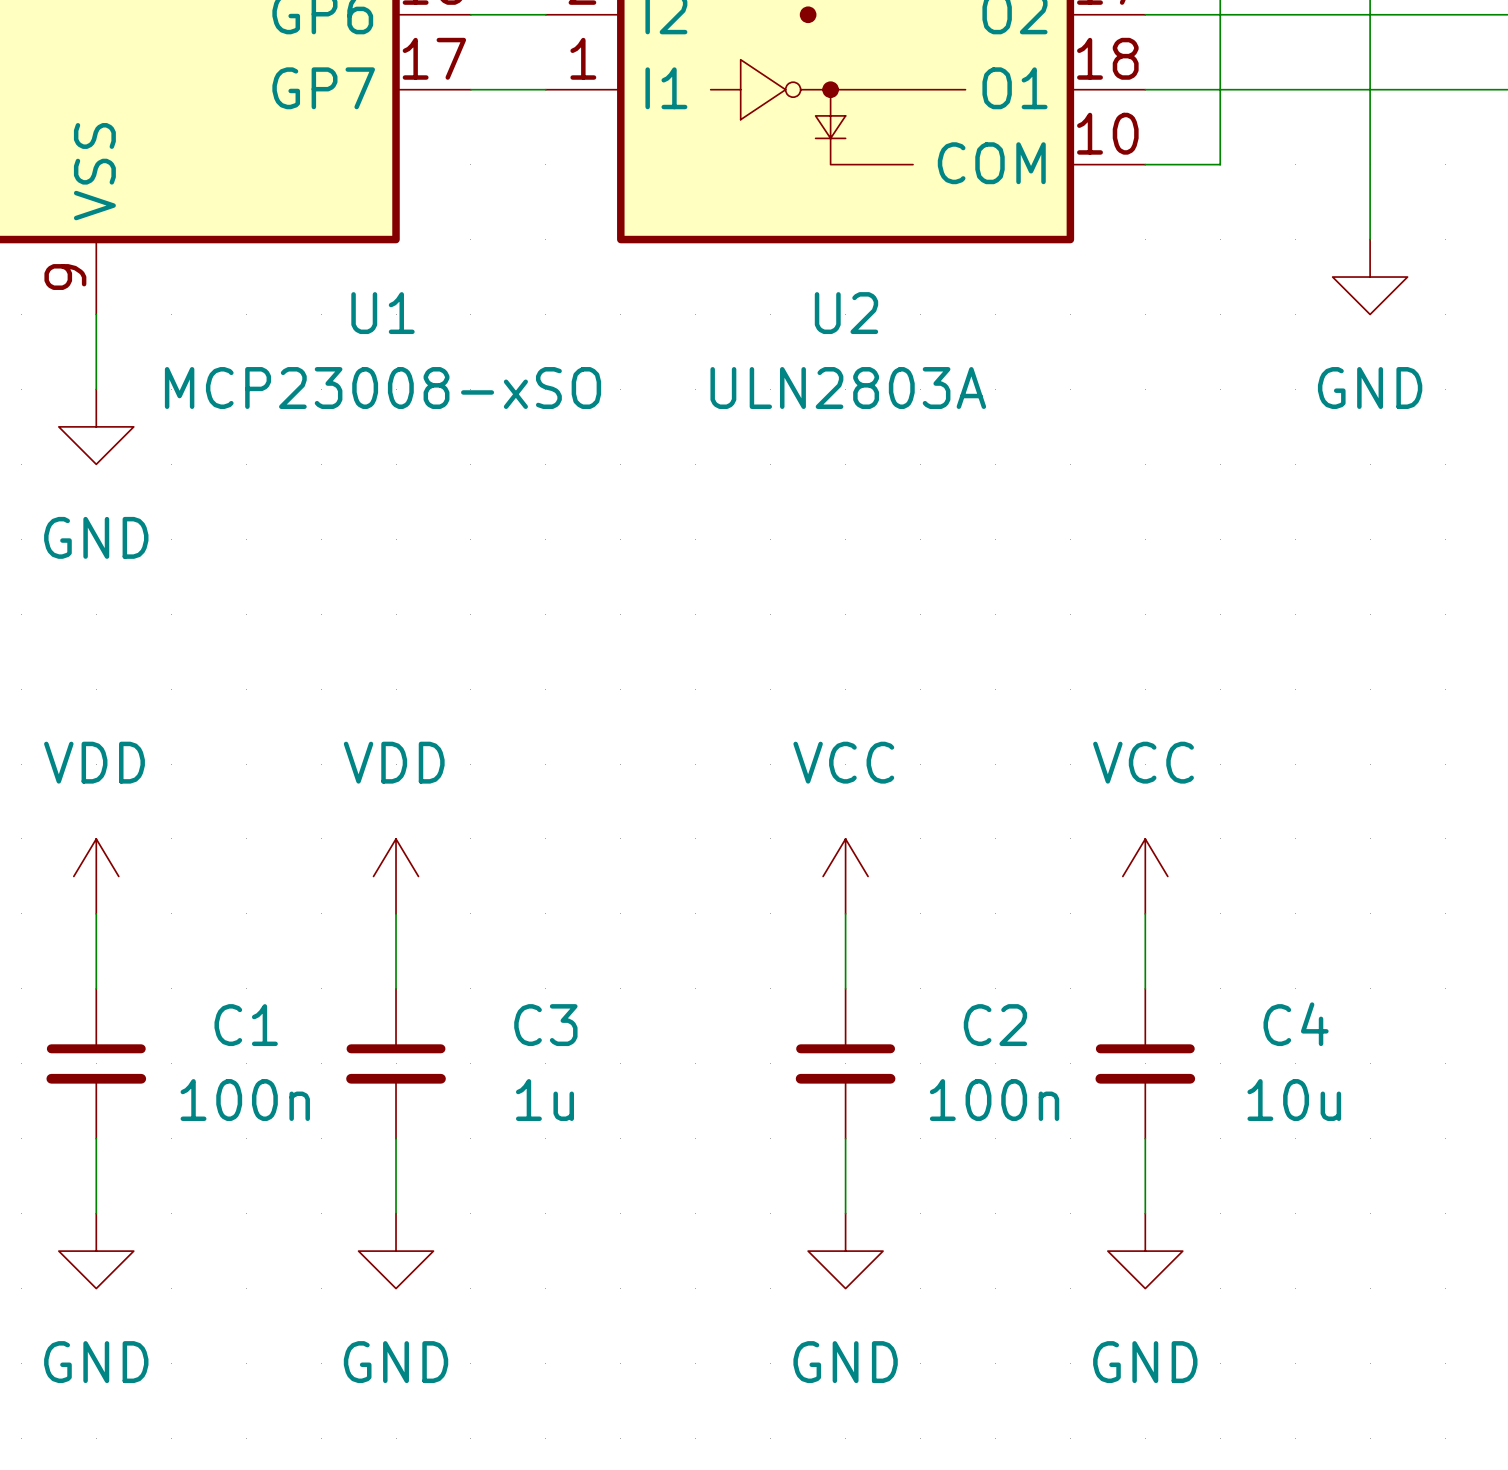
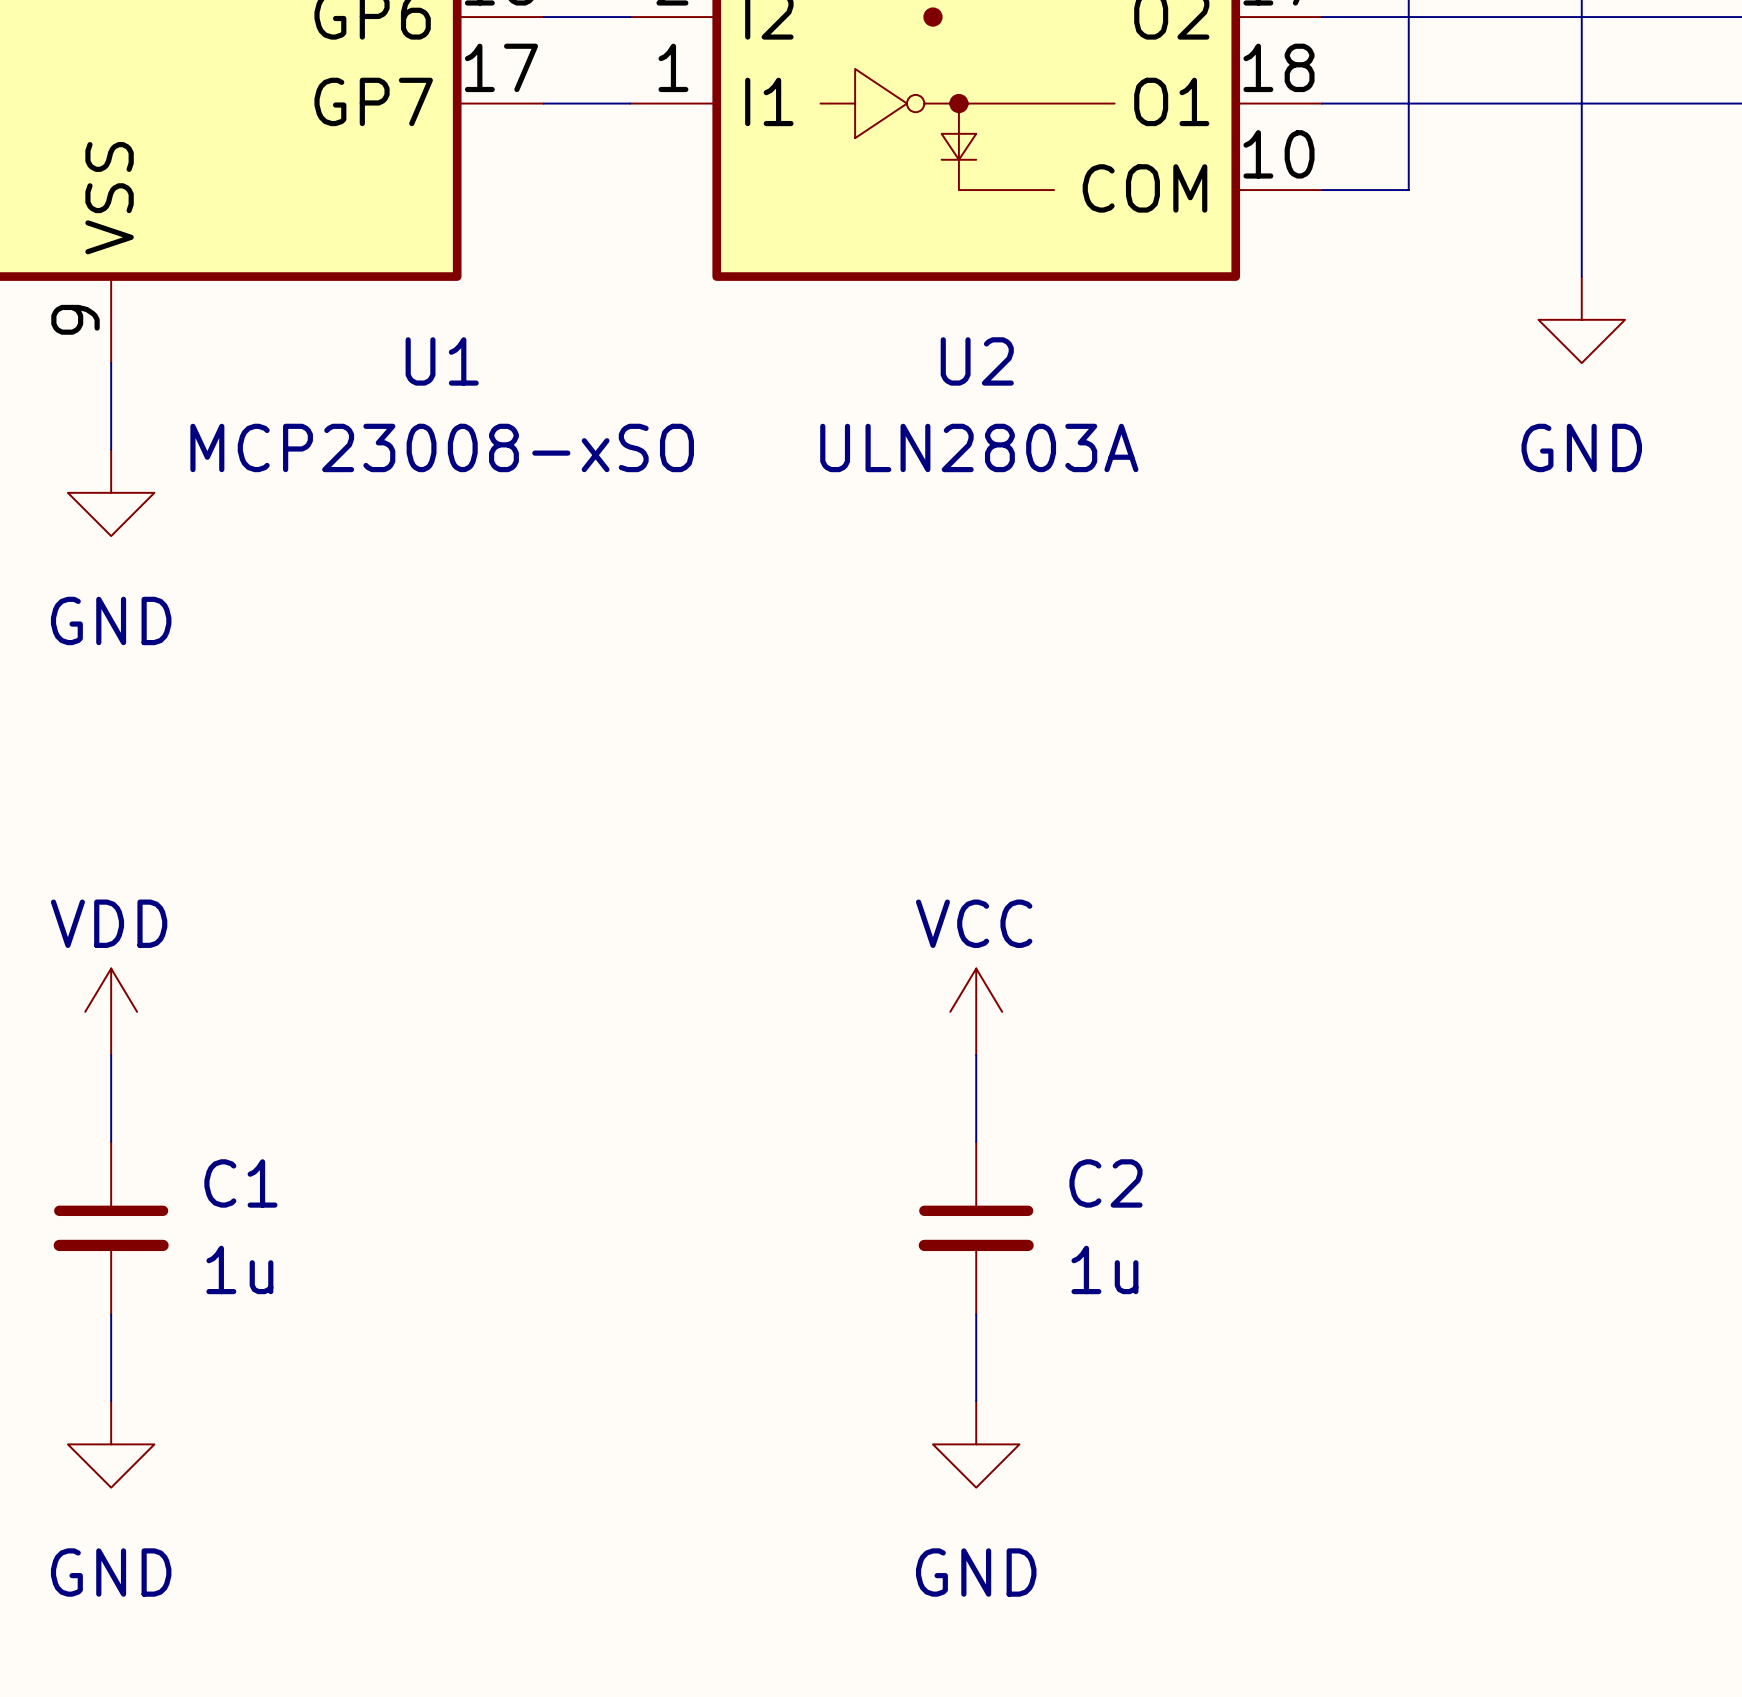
power symbol text position: VDD (94, 762) -> VDD (109, 923)
power symbol text position: VCC (843, 762) -> VCC (974, 923)
power symbol: VDD (396, 876) -> none
power symbol: VCC (1145, 876) -> none
wire: (396, 913) (396, 988) -> none
wire: (1145, 913) (1145, 988) -> none
C1 name position: C1 (246, 1025) -> C1 (240, 1183)
C2 name position: C2 (995, 1025) -> C2 (1105, 1183)
C3: 1u (396, 1063) -> none
C4: 10u (1145, 1063) -> none
C1 value: 100n (245, 1100) -> 1u (239, 1269)
C2 value: 100n (994, 1100) -> 1u (1104, 1269)
wire: (396, 1138) (396, 1213) -> none
wire: (1145, 1138) (1145, 1213) -> none
power symbol: GND (396, 1251) -> none
power symbol: GND (1145, 1251) -> none

